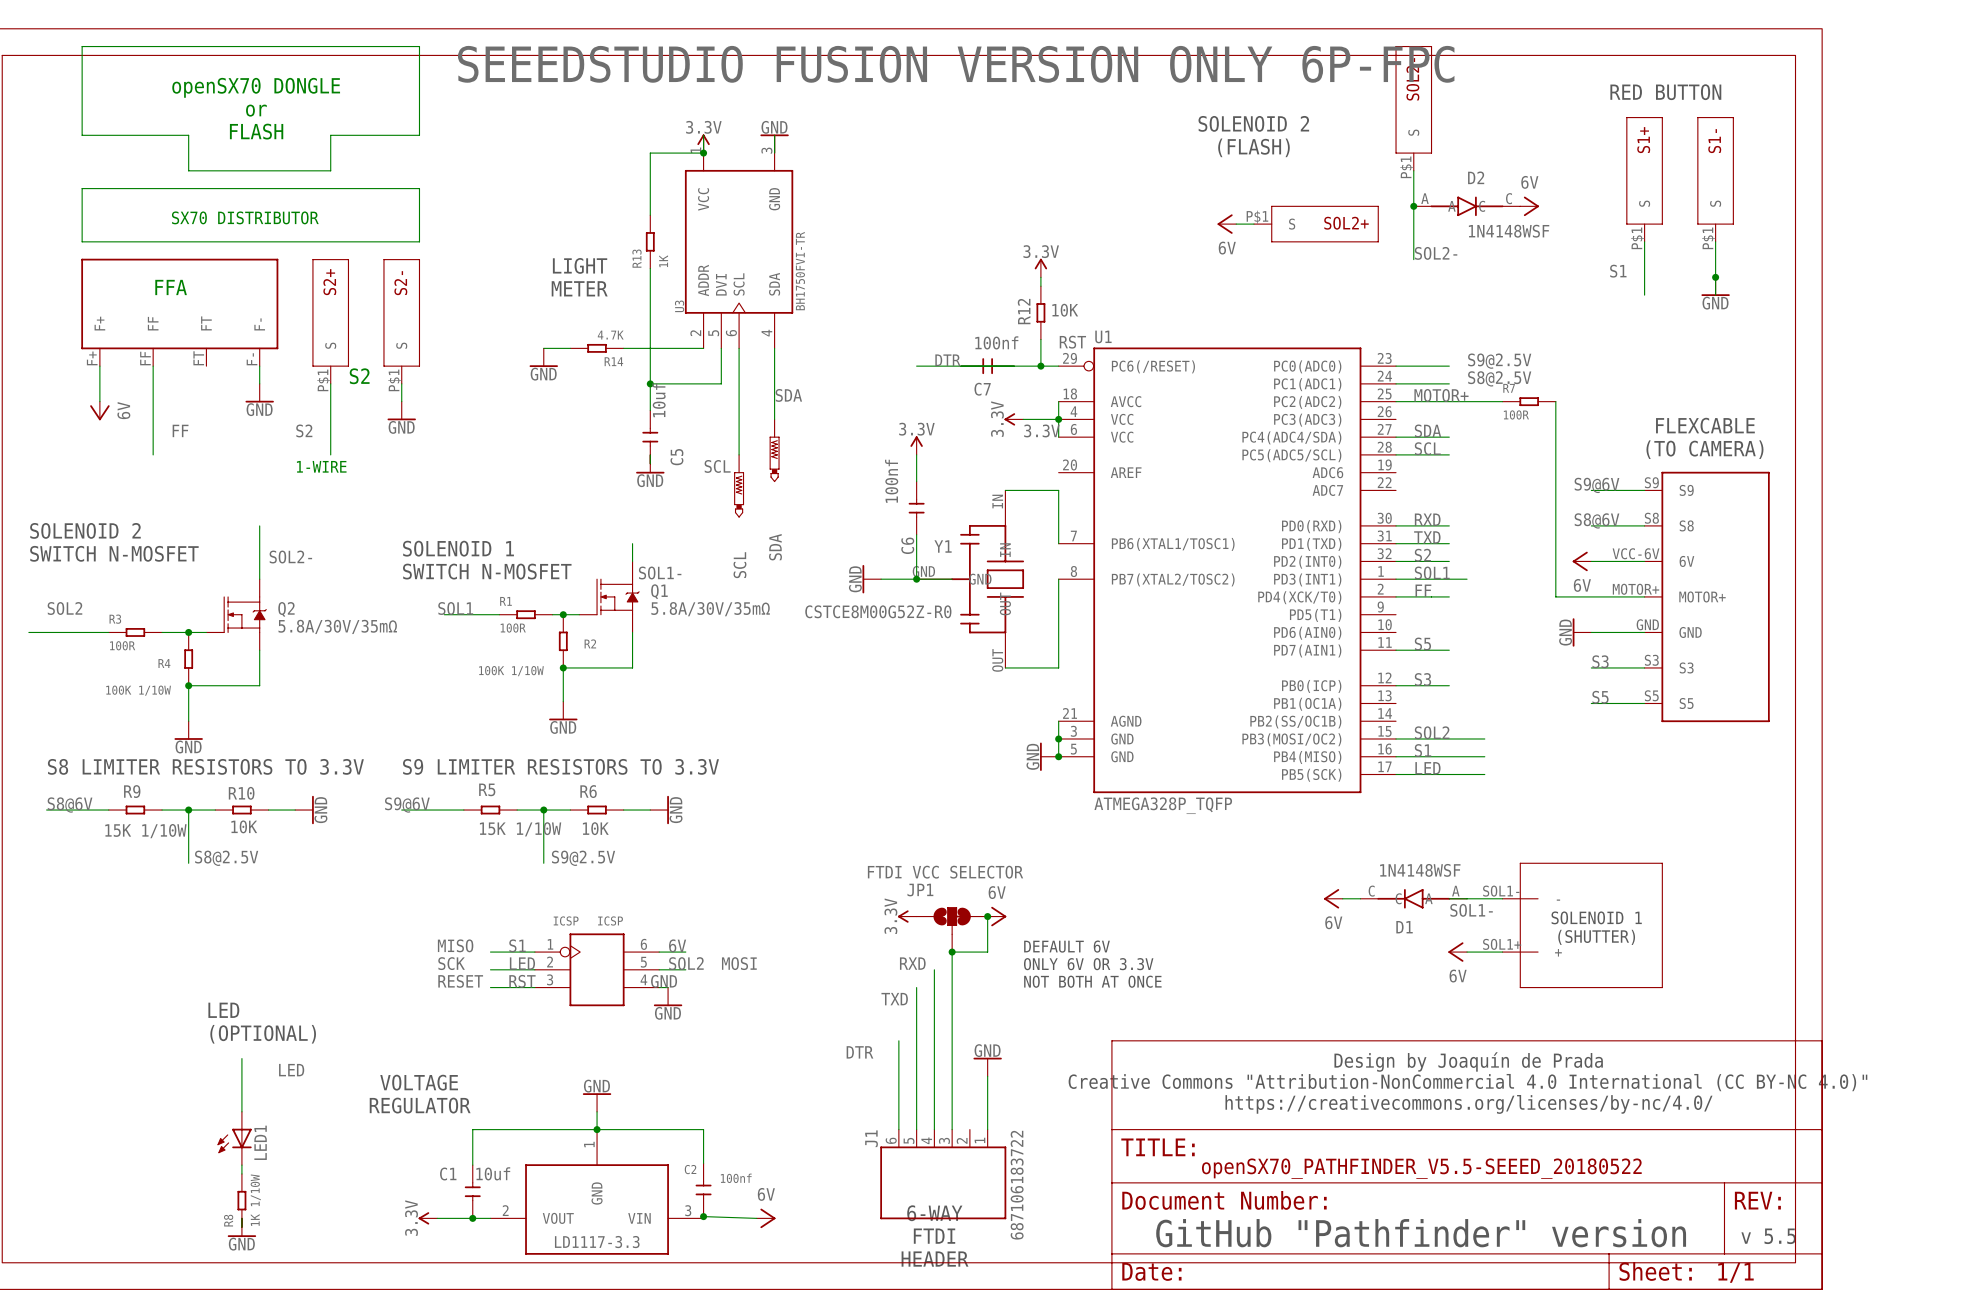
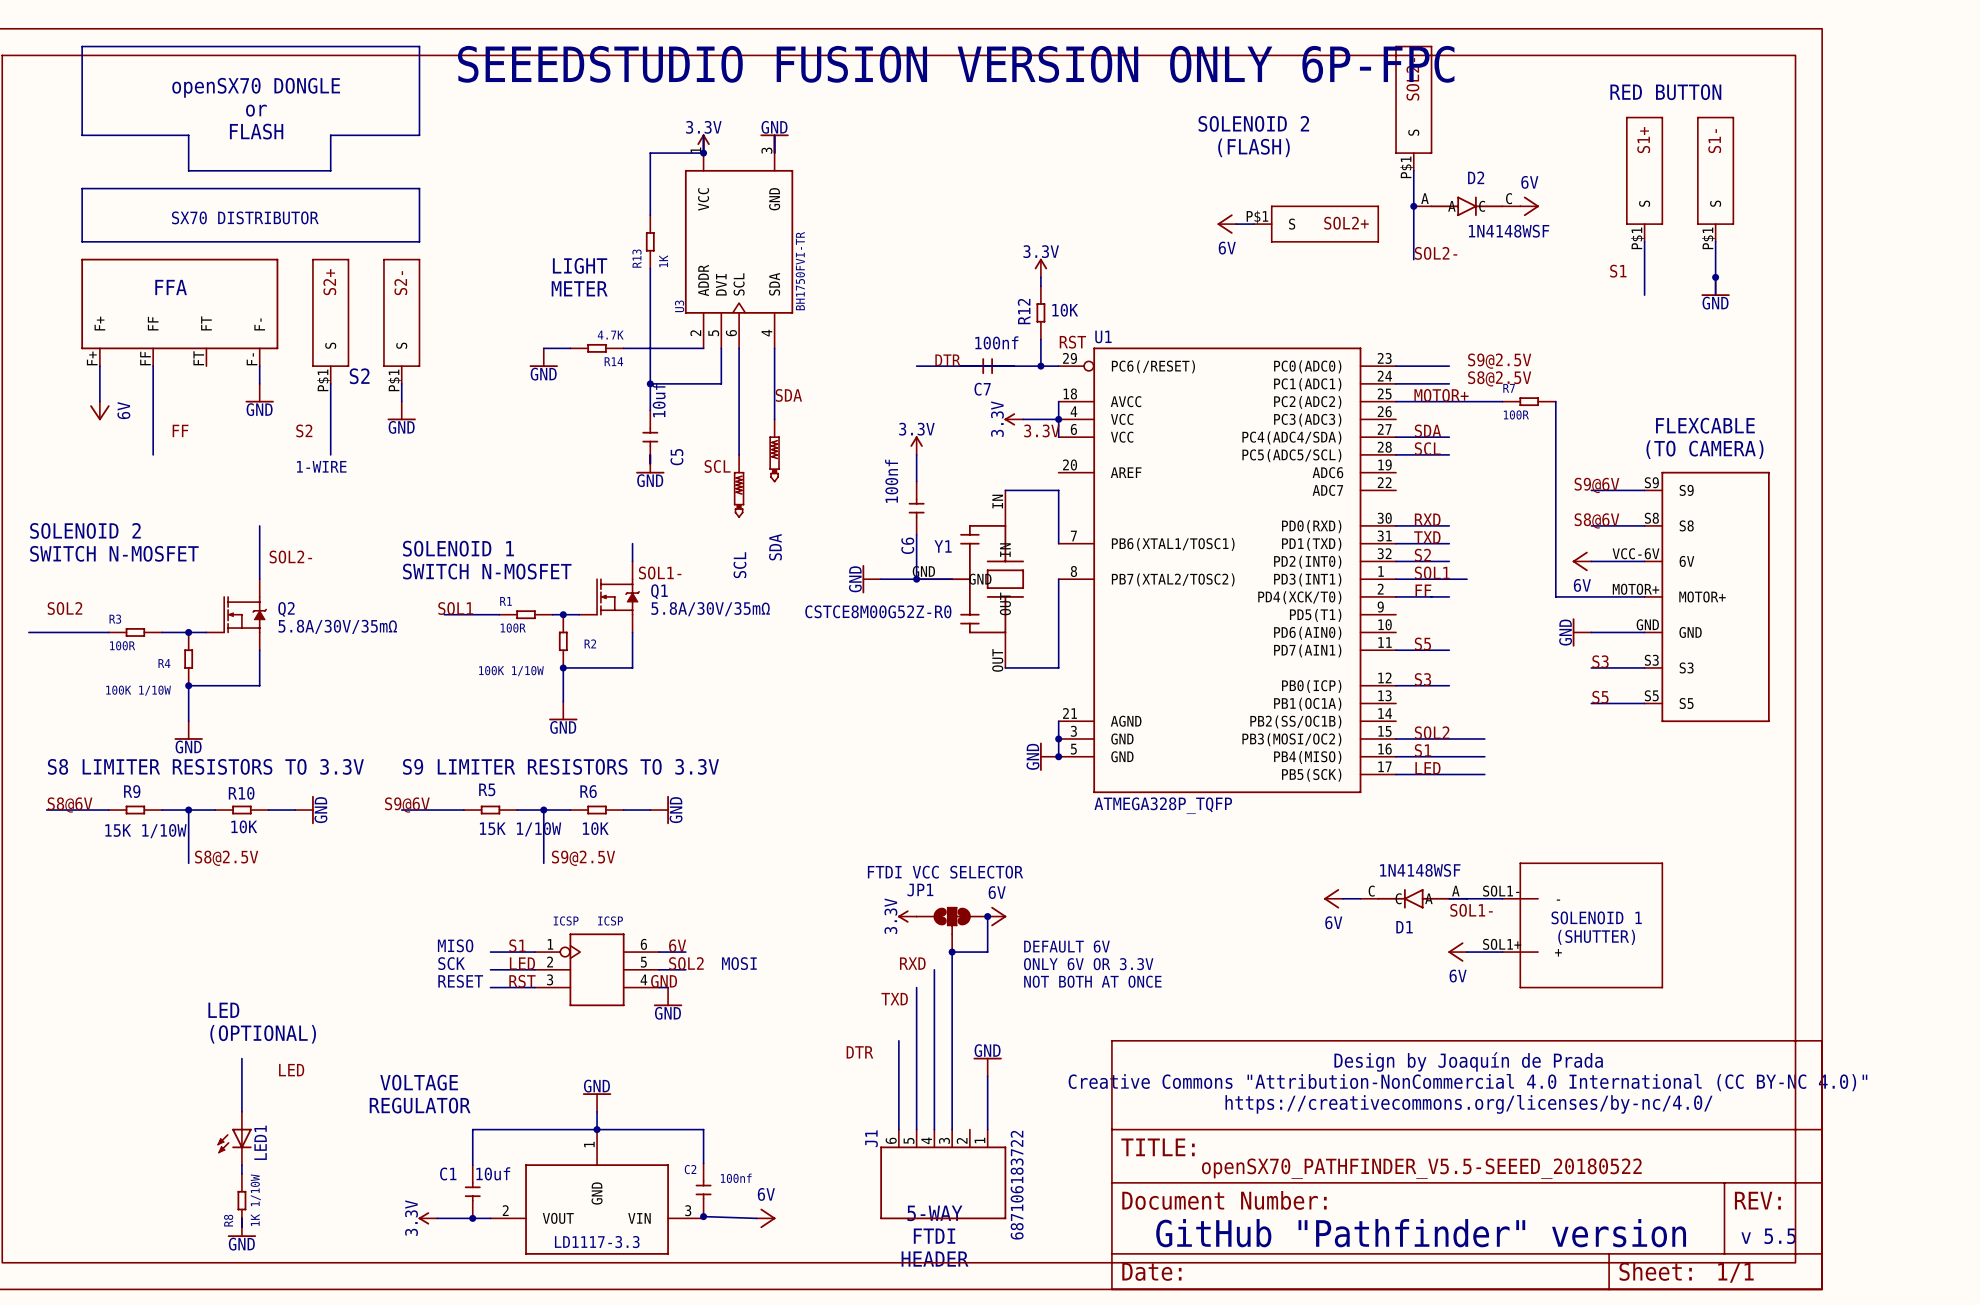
text: 6-WAY (934, 1213) -> 5-WAY (934, 1213)

